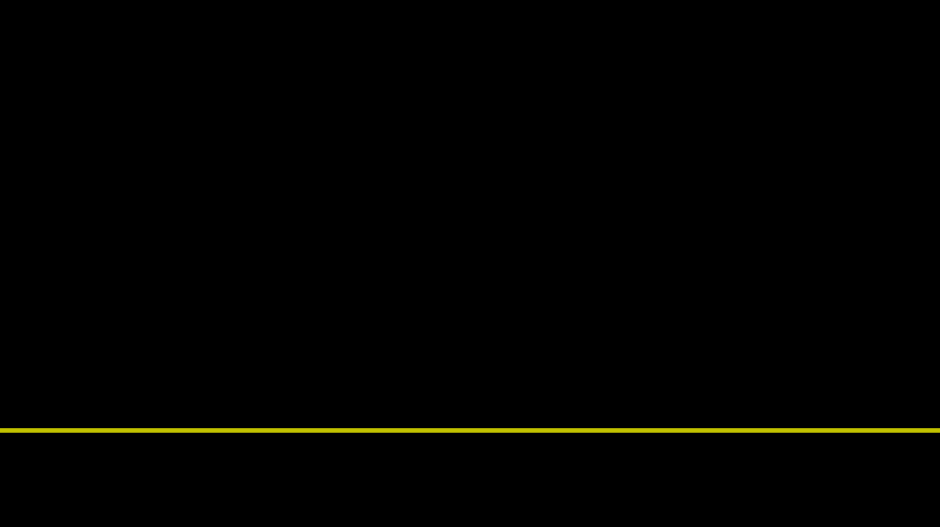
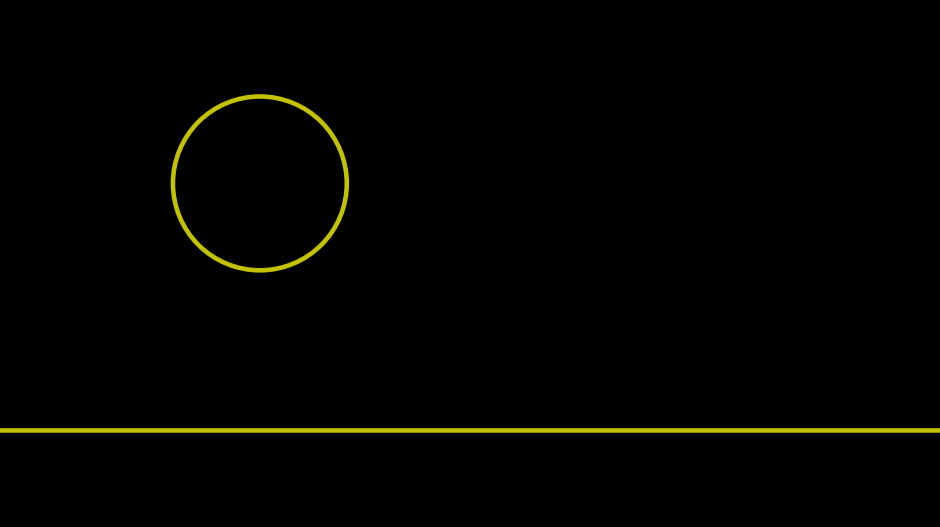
round board edge: none -> [170, 94, 350, 273]

